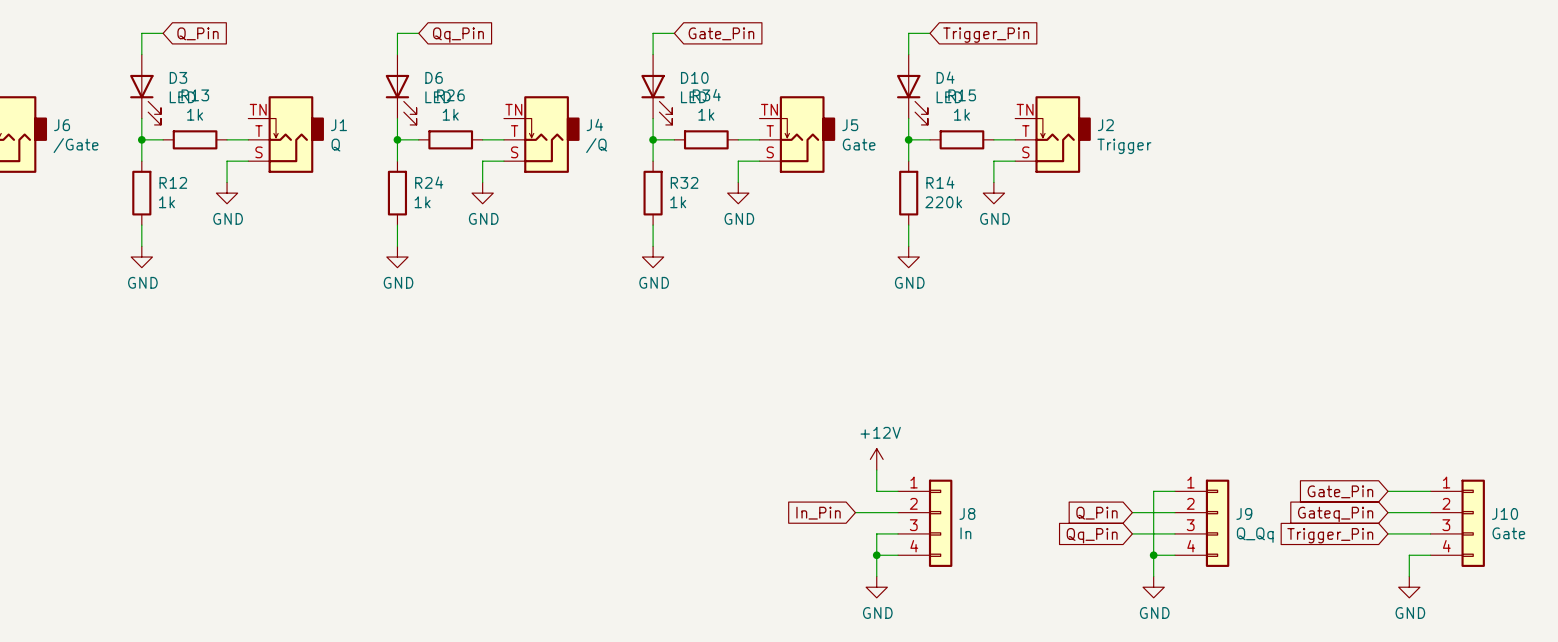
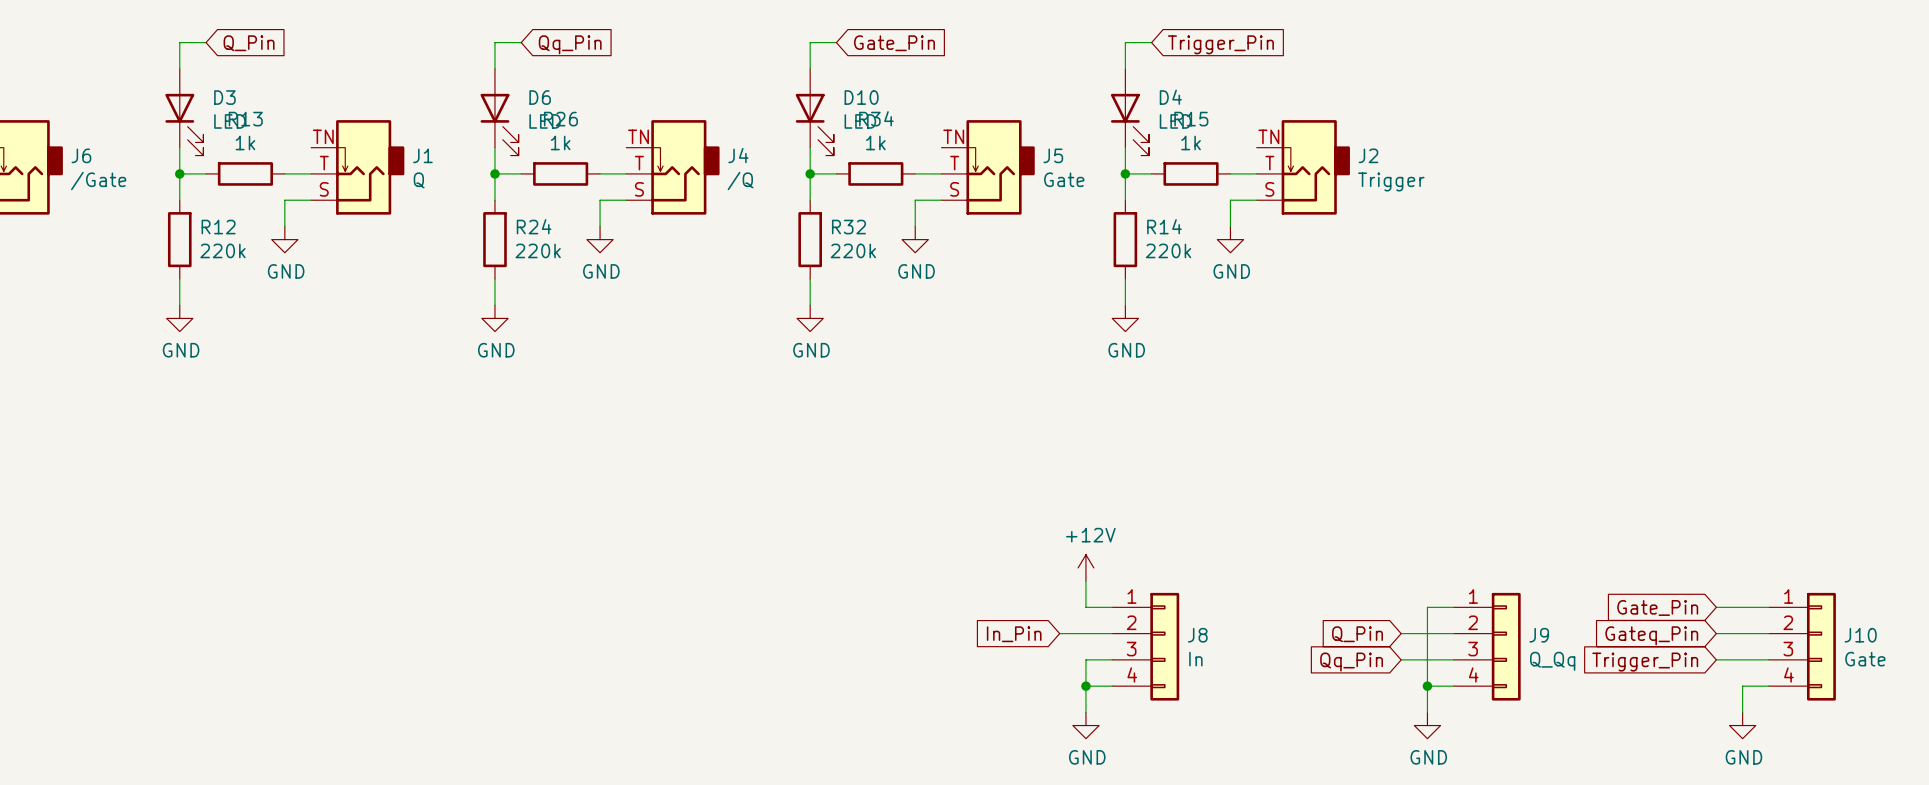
R12 value: 1k (166, 202) -> 220k (222, 250)
R24 value: 1k (422, 202) -> 220k (538, 250)
R32 value: 1k (678, 202) -> 220k (853, 250)

